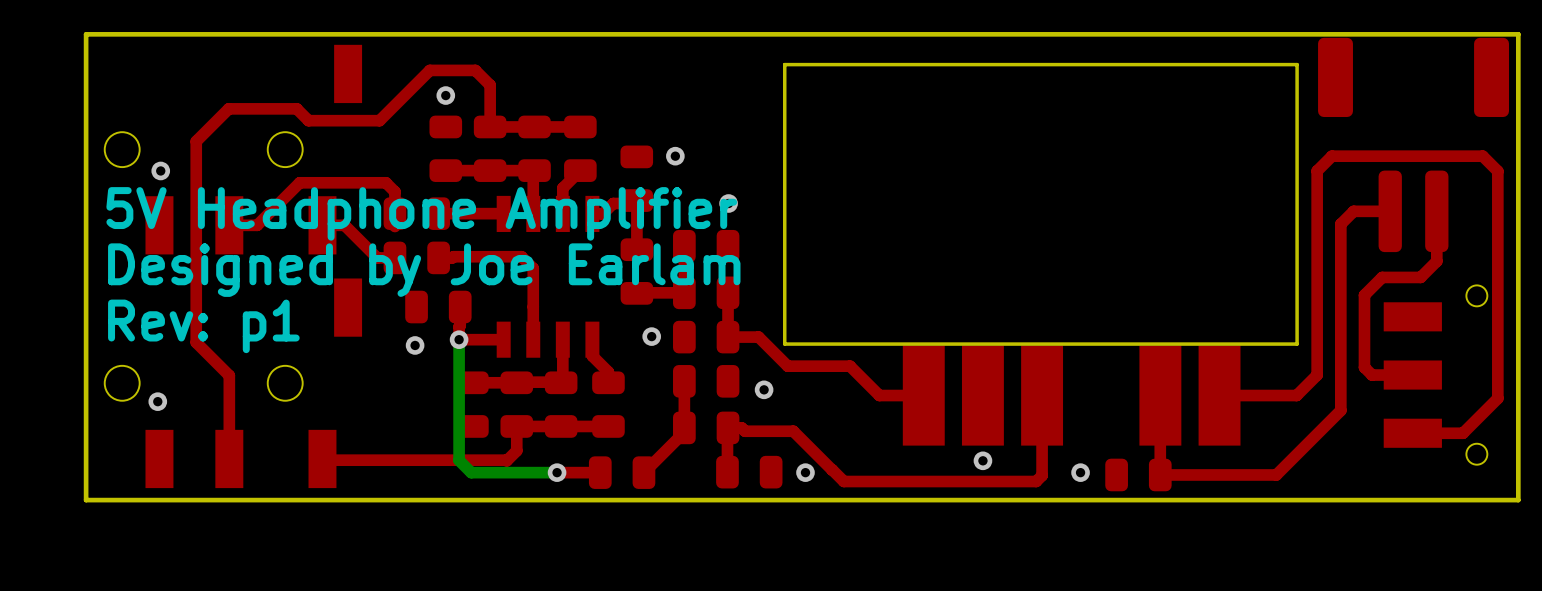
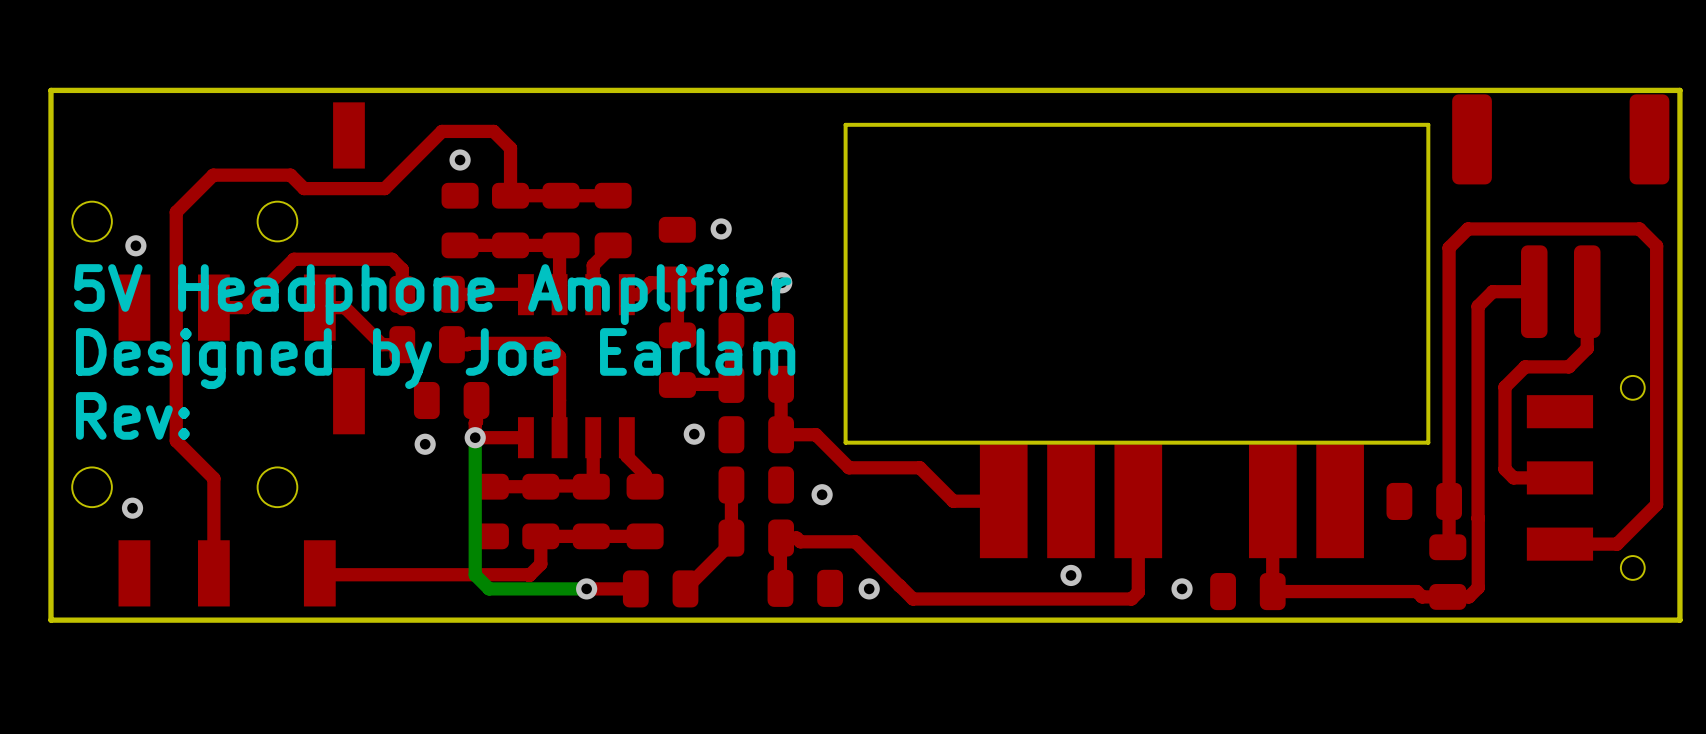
top track: (1317, 170) (1317, 375) (1296, 395) (1219, 395) -> (1451, 245) (1449, 247) (1447, 547)
text: Rev: p1 (203, 326) -> Rev: (132, 415)
part: none -> (1424, 501)
top track: (1340, 410) (1276, 474) -> (1478, 518) (1478, 587) (1468, 596) (1422, 596) (1416, 591) (1404, 591)
part: none -> (1447, 572)

